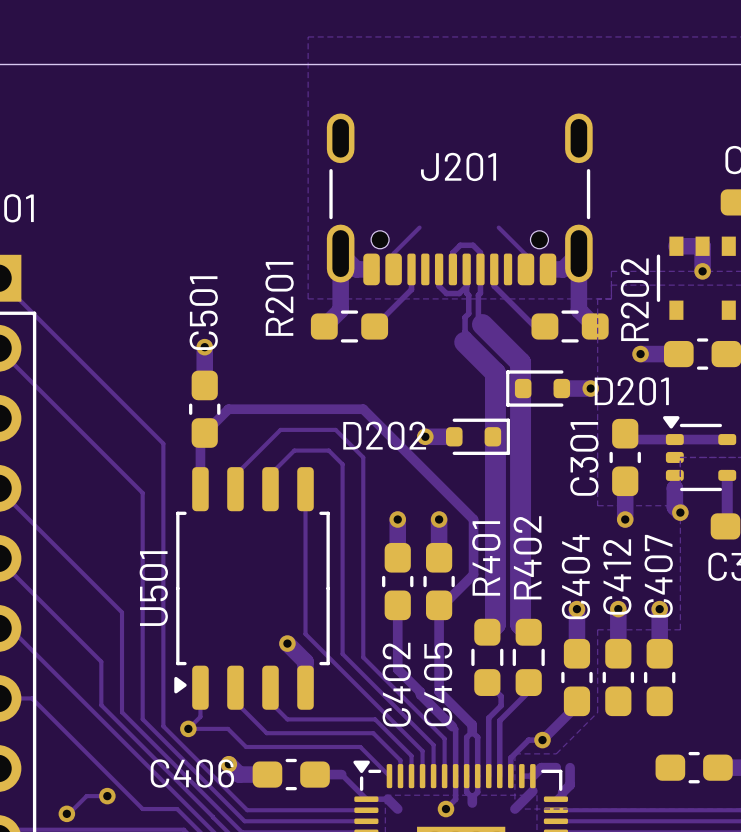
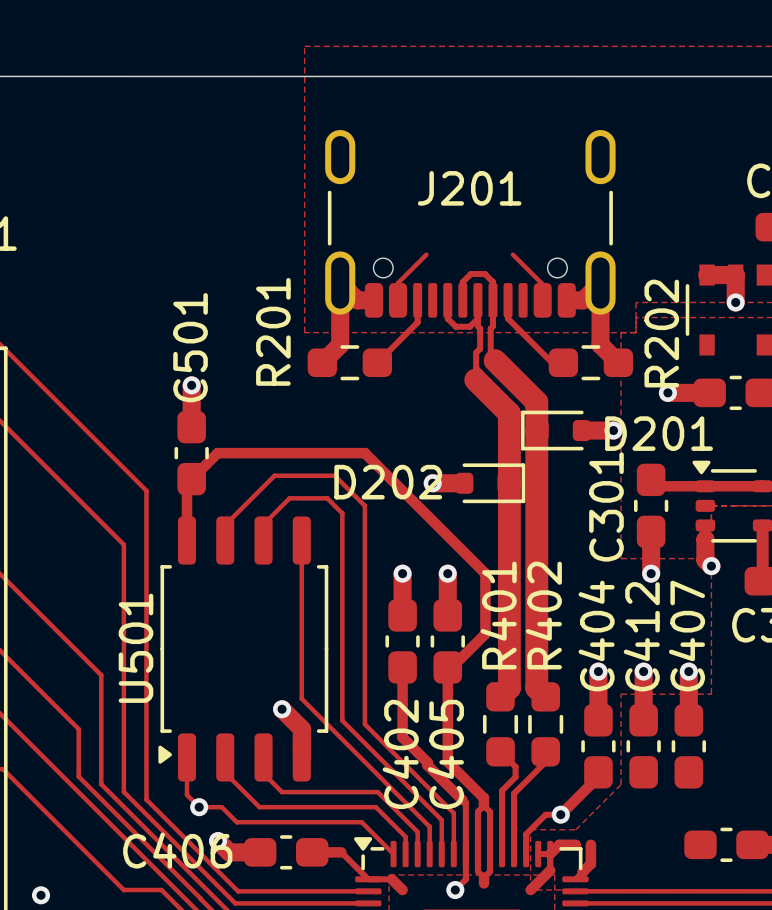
track: (200, 716) (188, 728) (227, 728) (232, 733) -> (187, 789) (187, 794) (199, 807) (221, 807)
via position: (188, 728) -> (199, 807)
track: (107, 796) (86, 796) (66, 813) -> none
via: (107, 796) -> none

